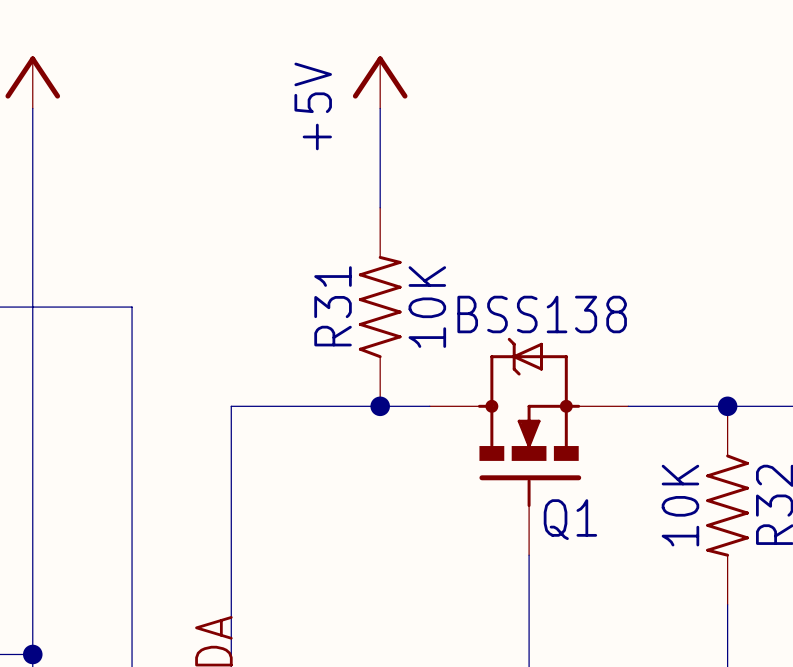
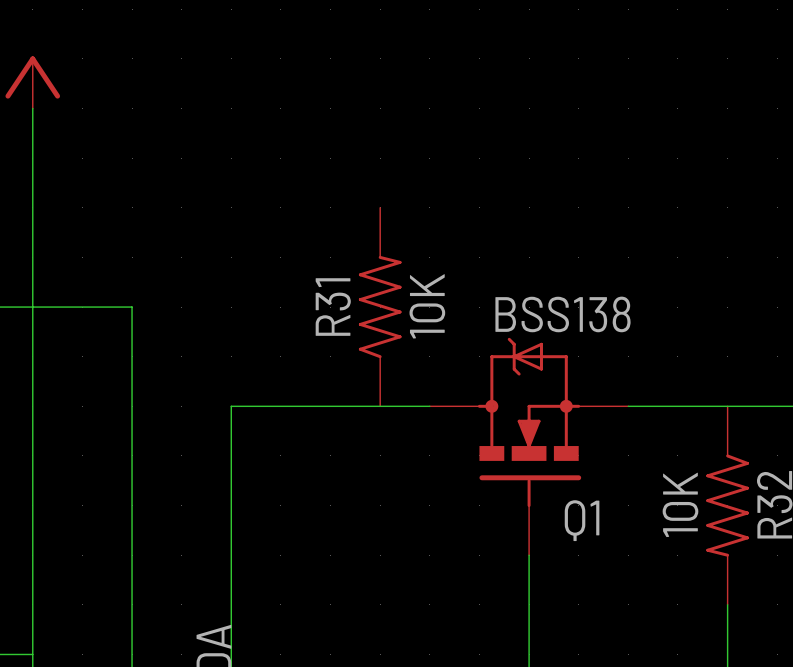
power symbol: +5V (380, 82) -> none
wire: (380, 108) (380, 207) -> none
junction: (380, 406) -> none
junction: (727, 406) -> none
junction: (32, 654) -> none

